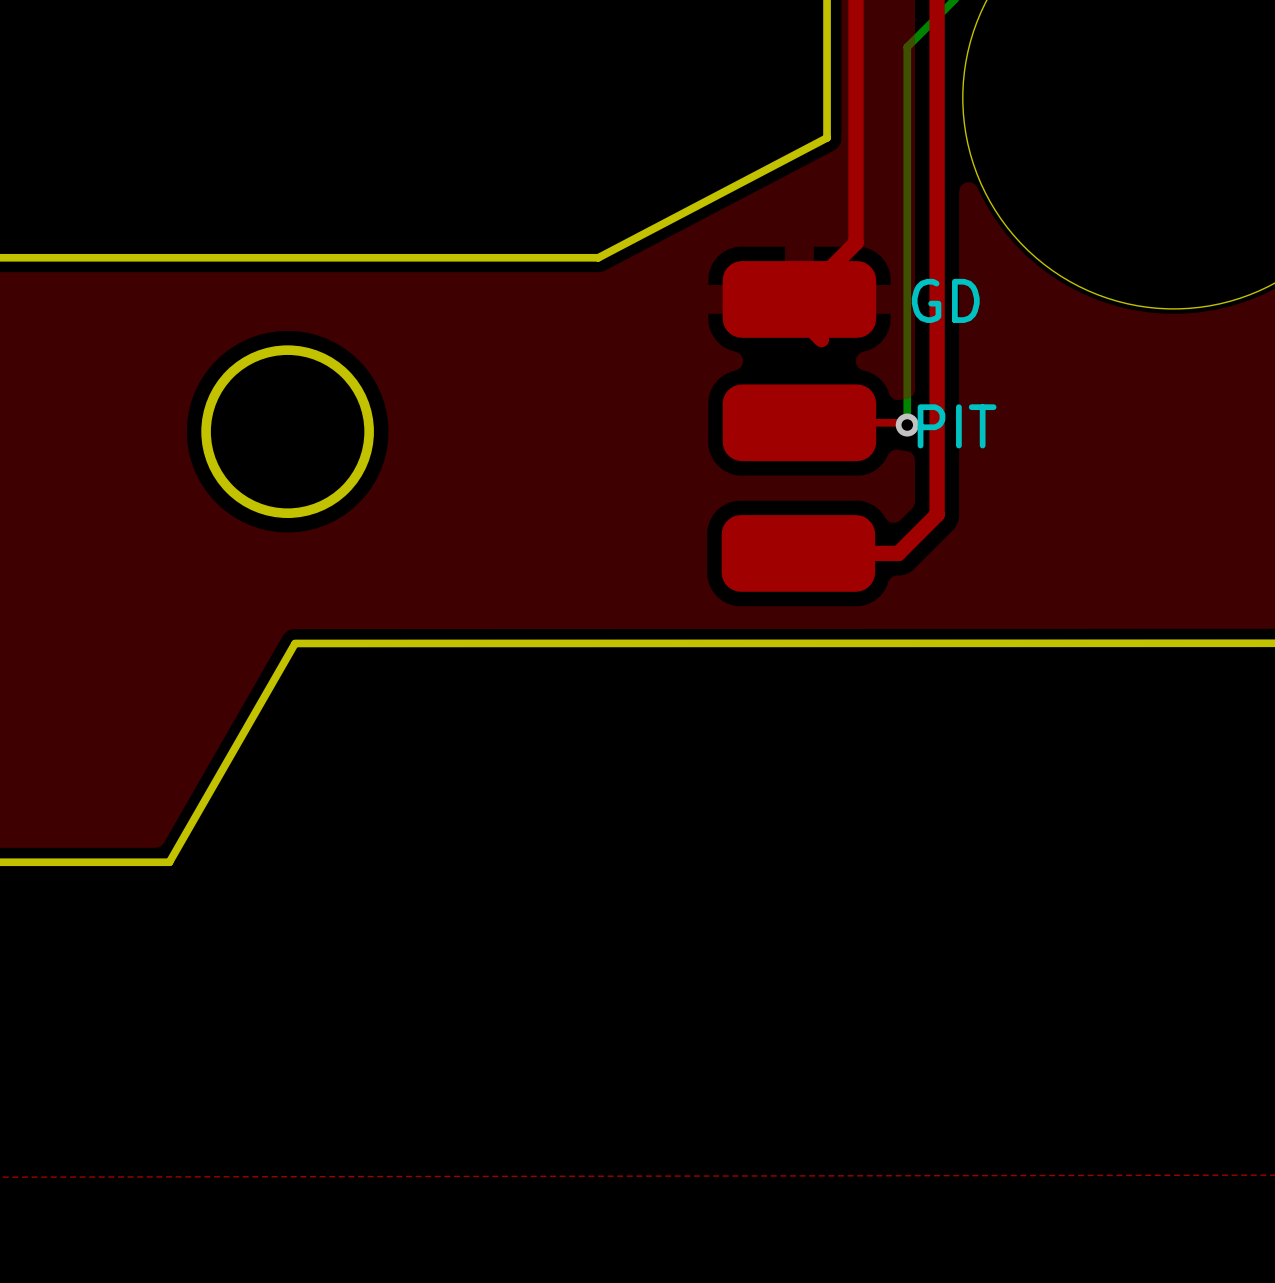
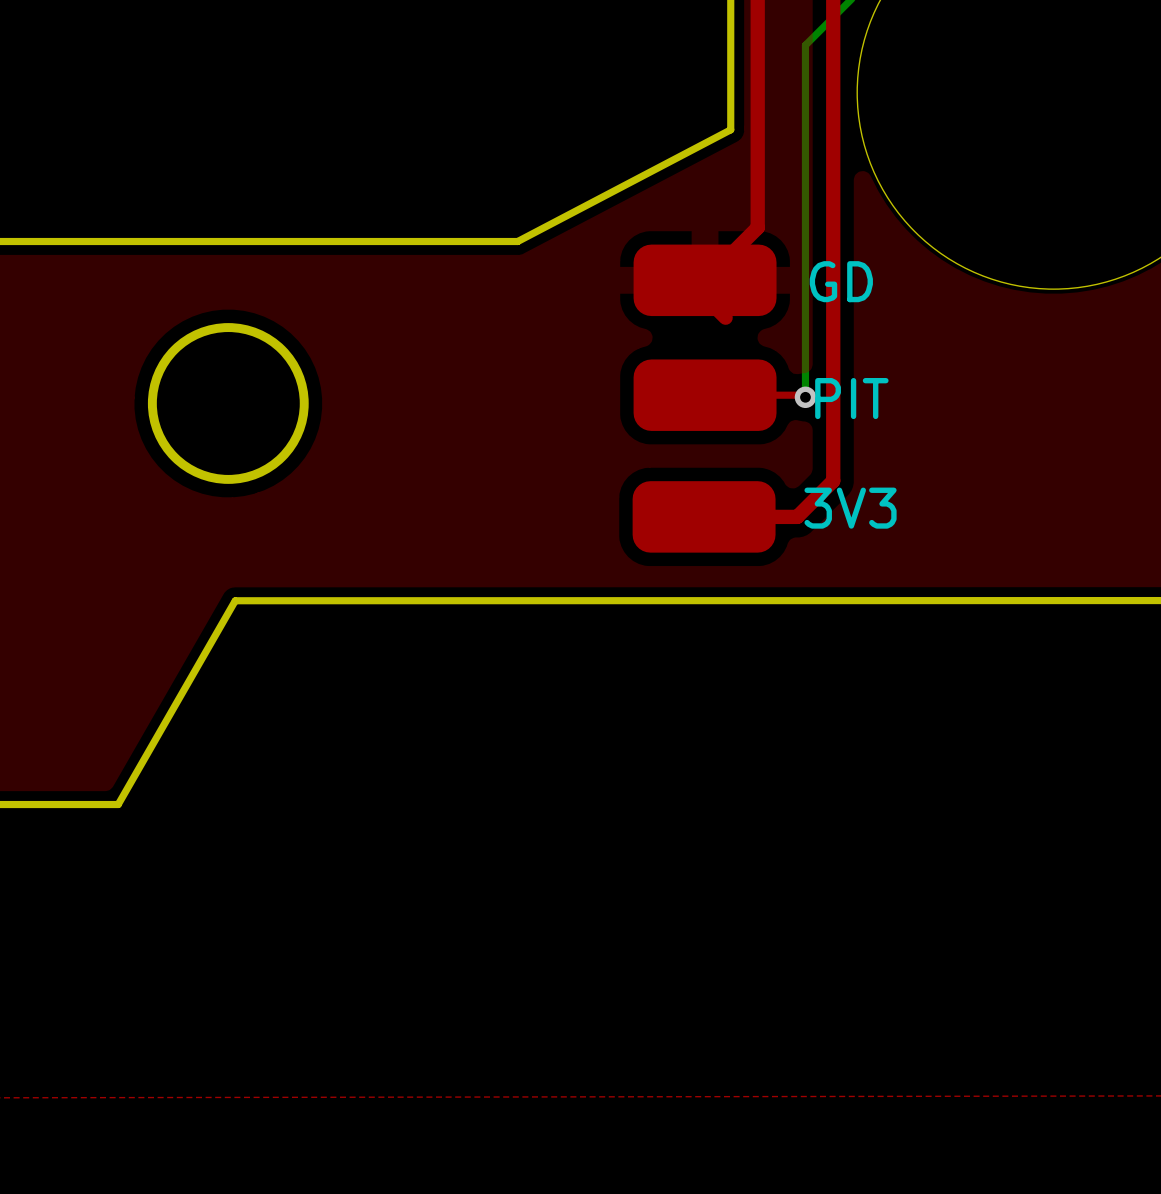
text: none -> 3V3 (850, 508)

